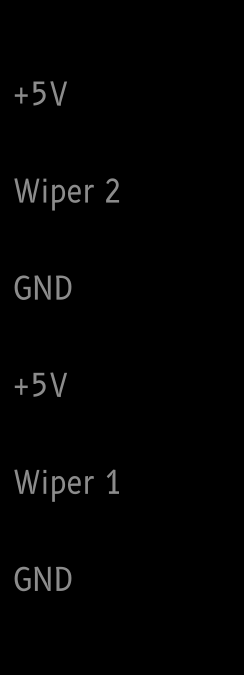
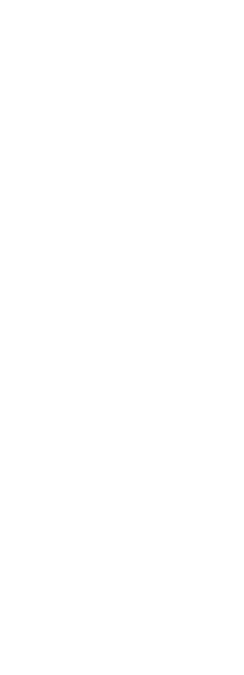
text: +5V (40, 93) -> none
text: Wiper 2 (66, 194) -> none
text: GND (43, 287) -> none
text: +5V (40, 384) -> none
text: Wiper 1 (66, 485) -> none
text: GND (43, 578) -> none

